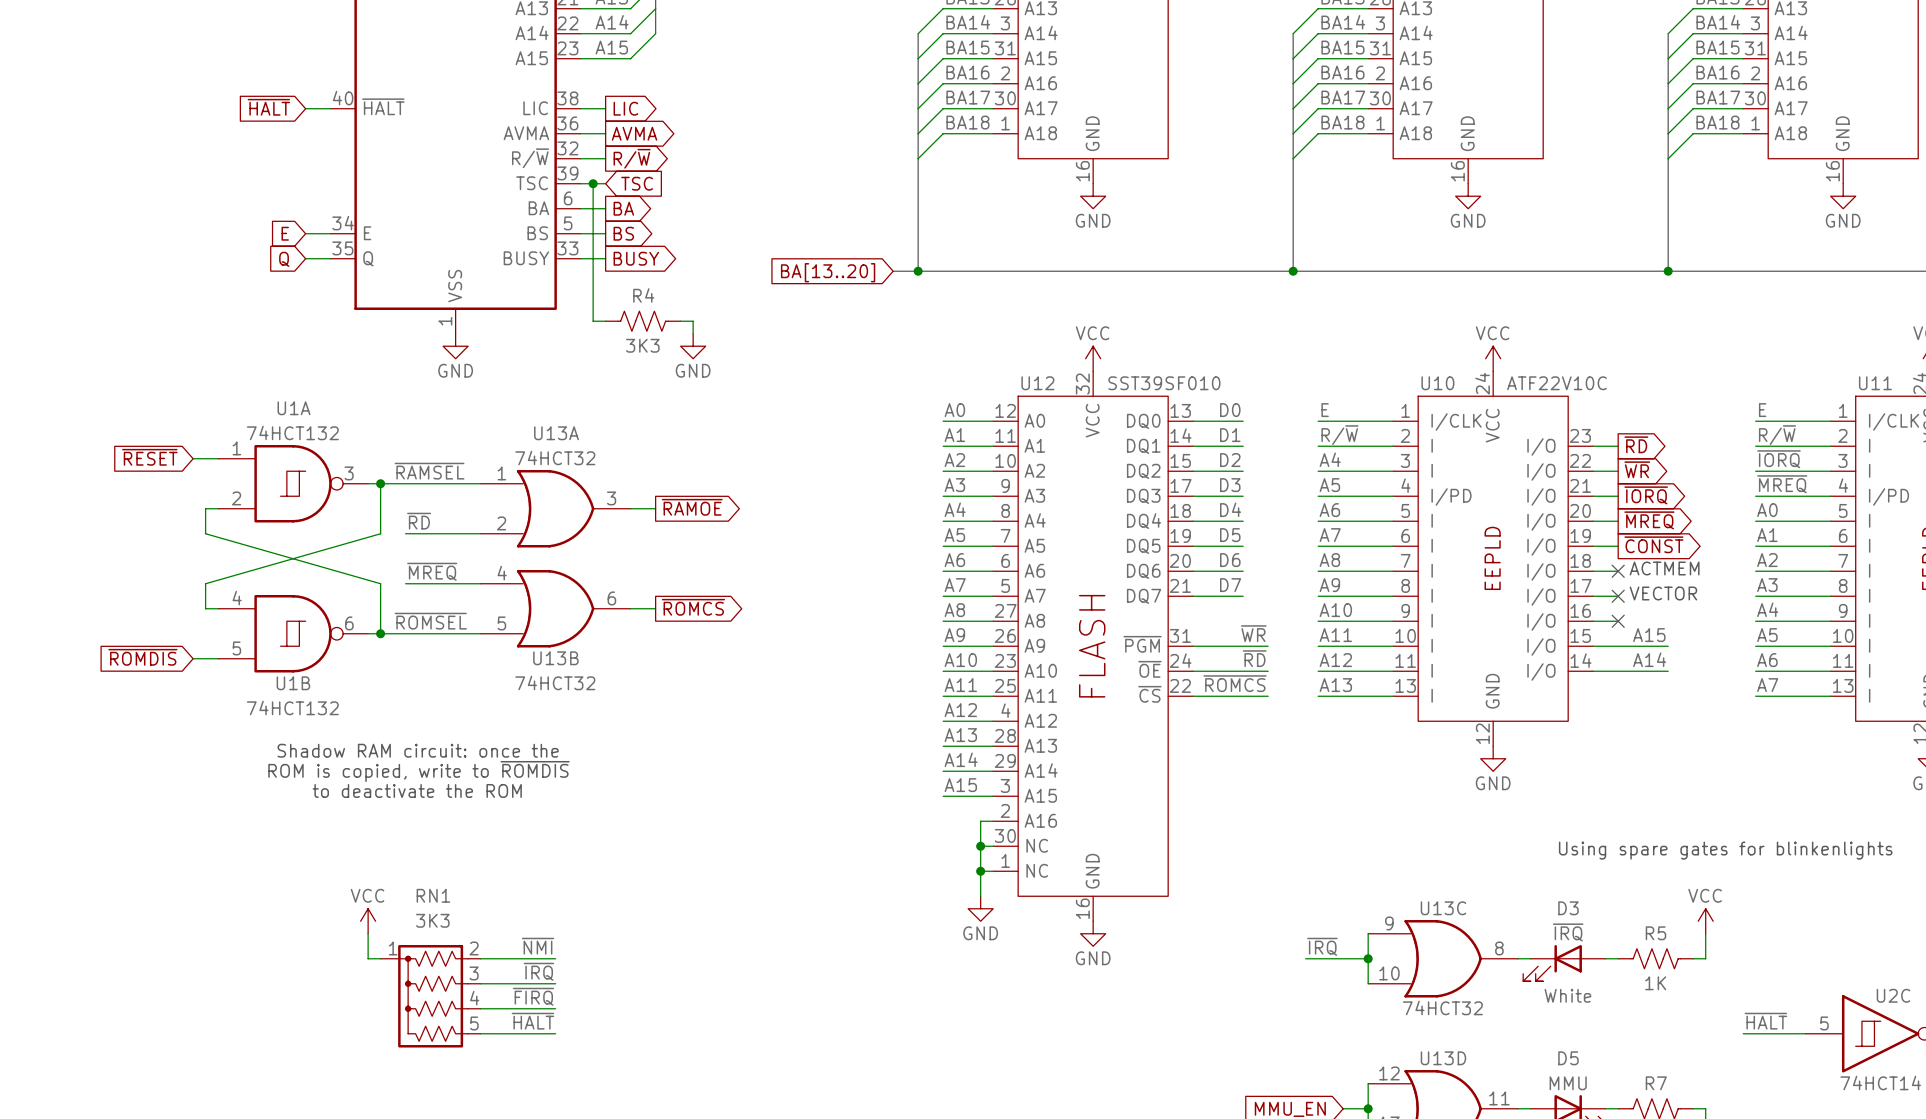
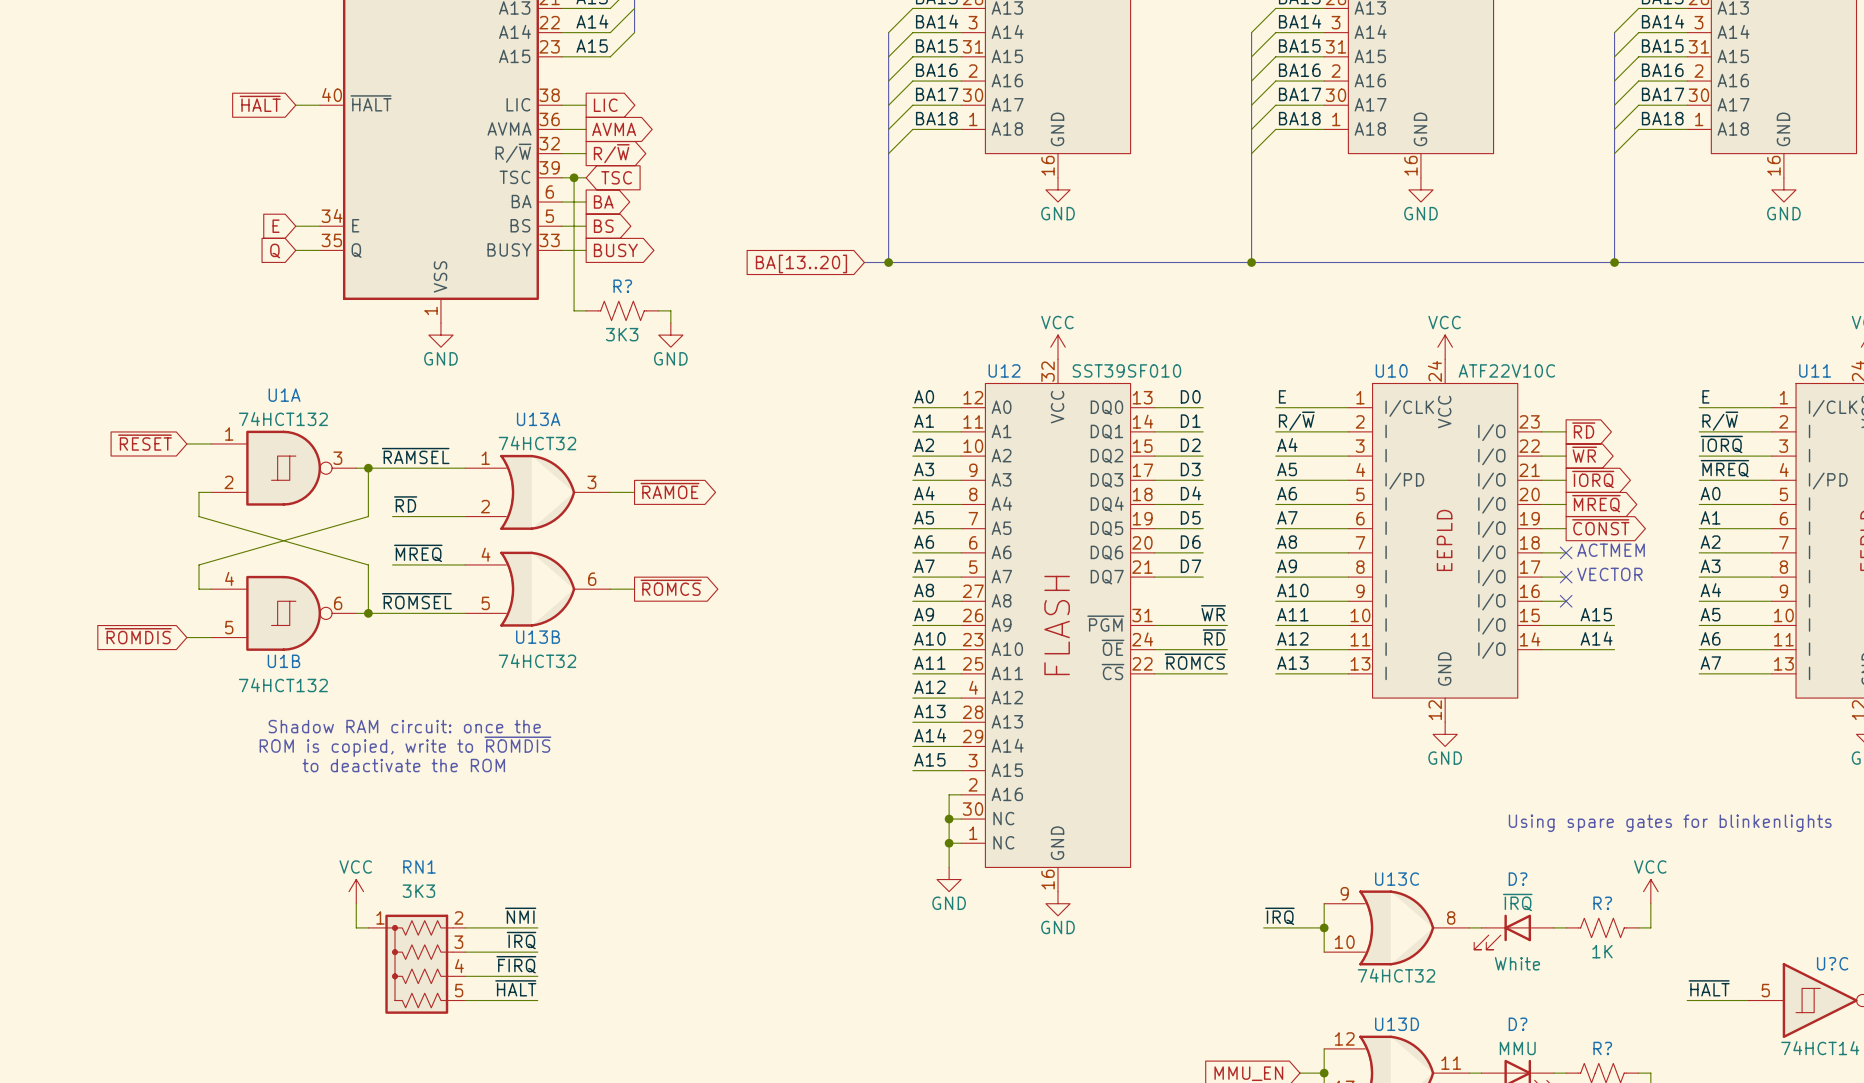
R4 name: R4 (643, 295) -> R? (622, 286)
D3 name: D3 (1568, 908) -> D? (1518, 879)
R5 name: R5 (1655, 933) -> R? (1602, 903)
U2C name: U2C (1893, 995) -> U?C (1832, 963)
D5 name: D5 (1568, 1058) -> D? (1518, 1024)
R7 name: R7 (1656, 1083) -> R? (1602, 1048)

